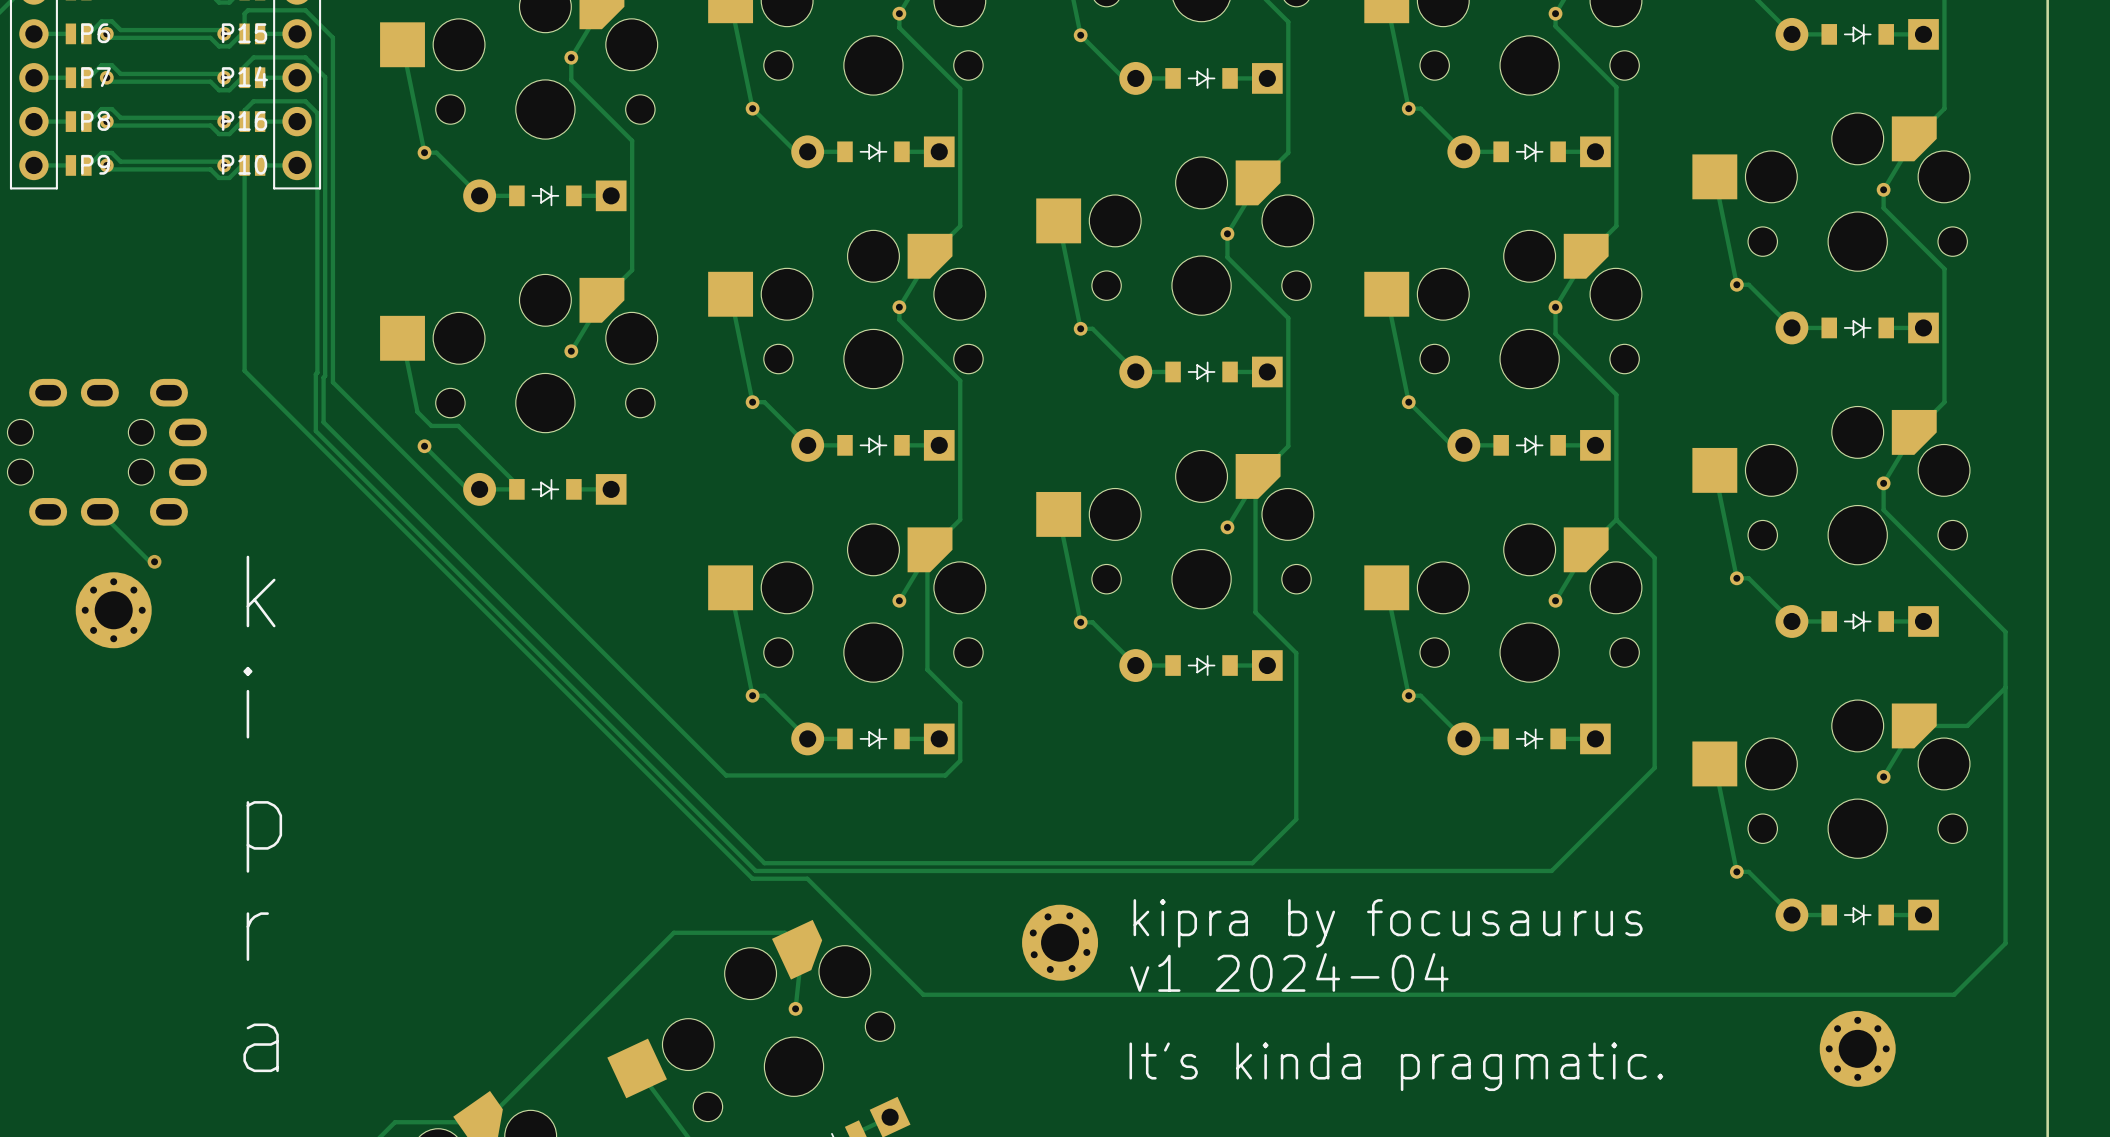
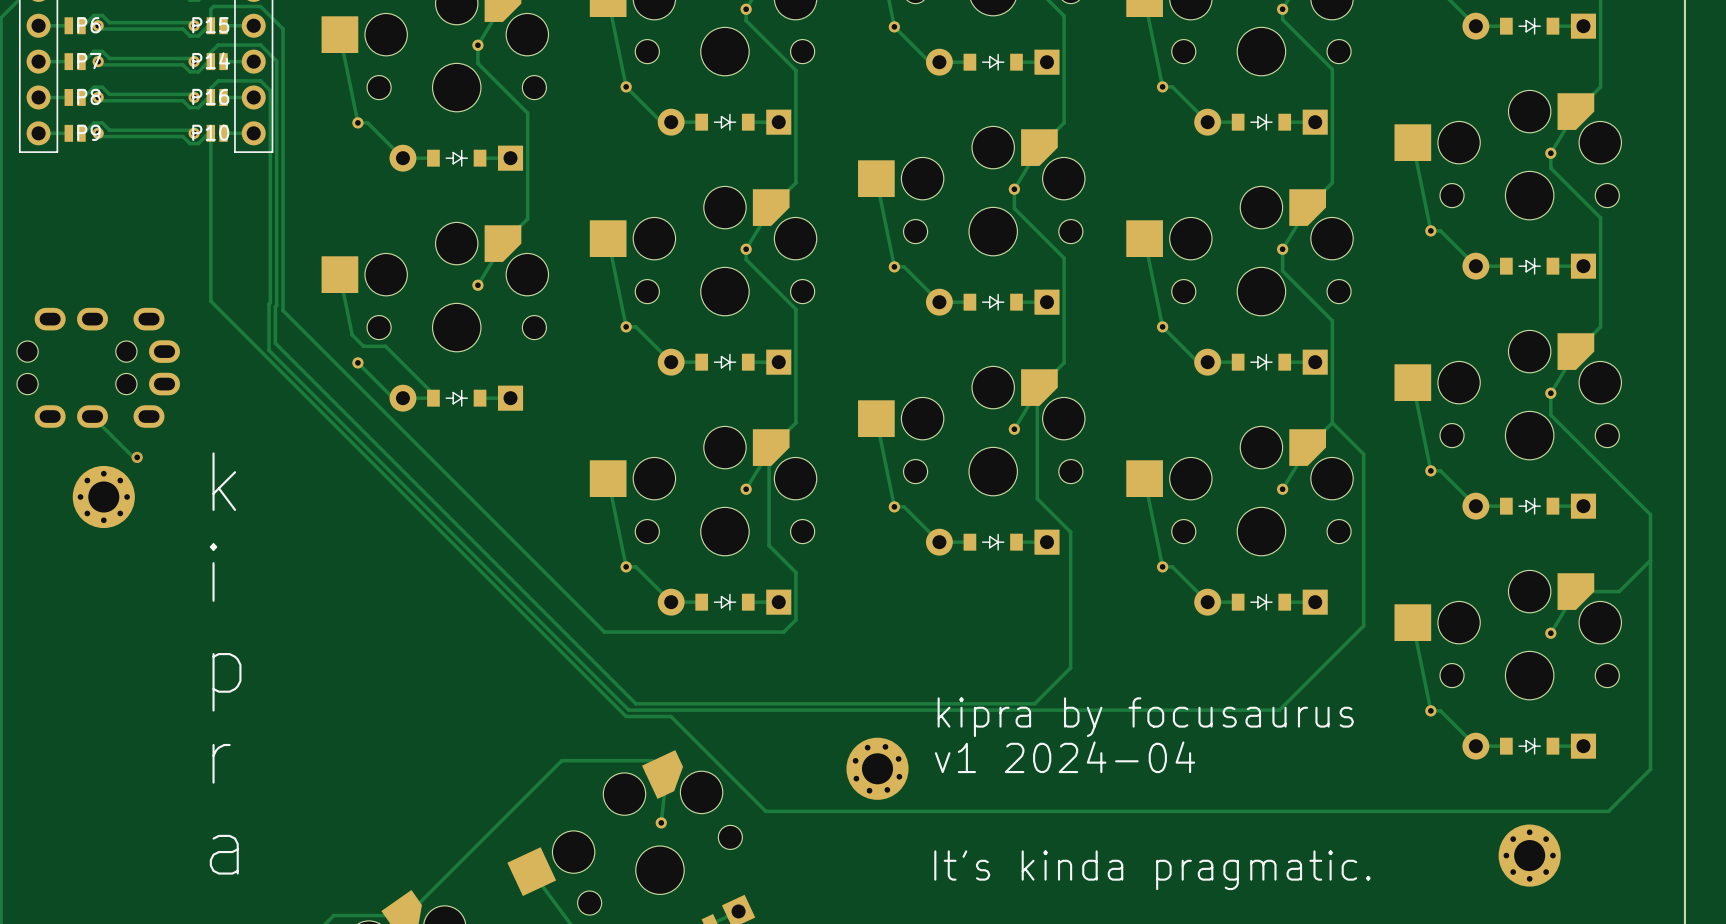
text position: kipra by focusaurus (1388, 923) -> kipra by focusaurus (1145, 717)
text position: v1 2024-04 (1289, 972) -> v1 2024-04 (1065, 757)

